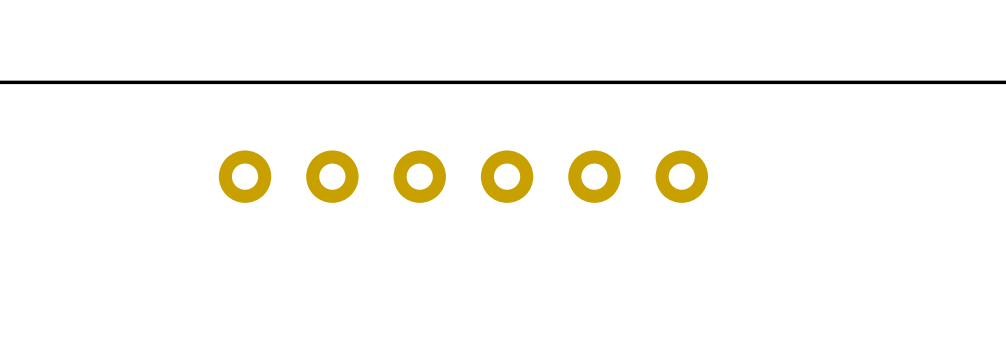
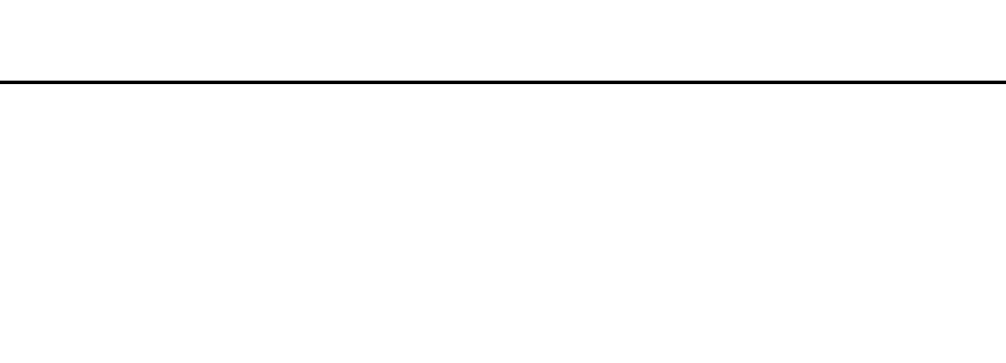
part: (463, 176) -> none

